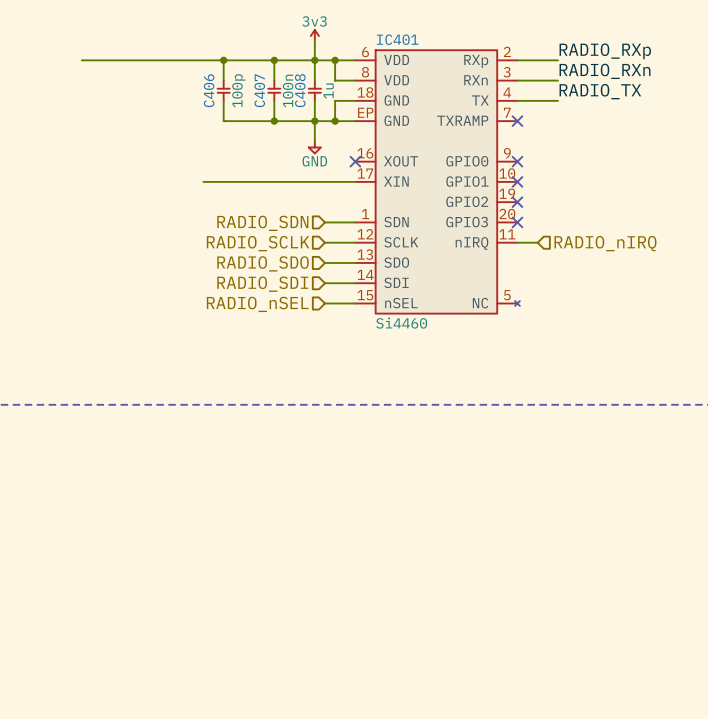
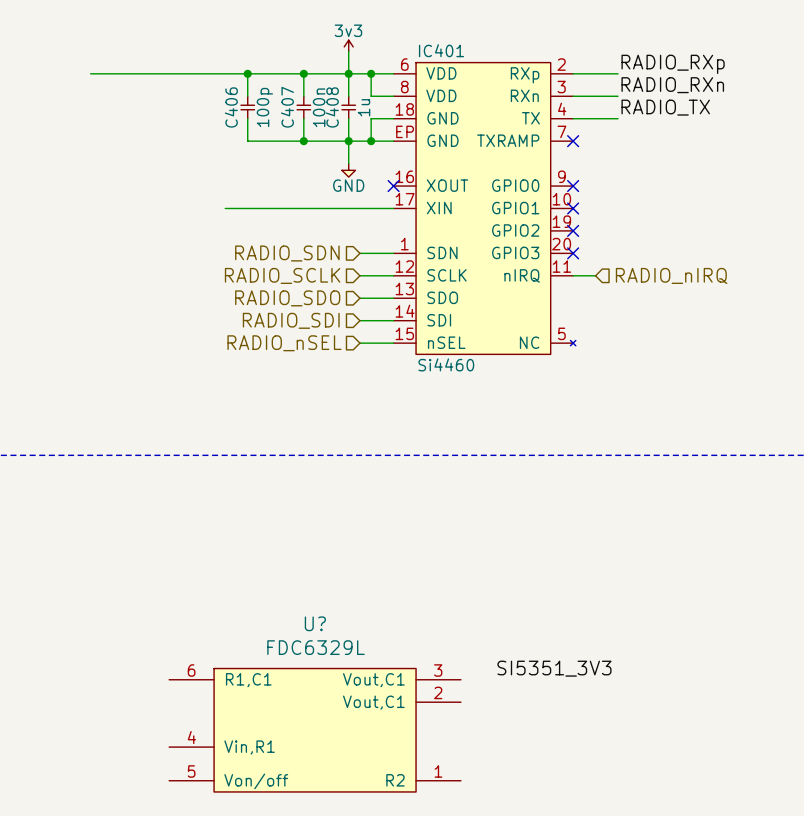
label: none -> SI5351_3V3 (554, 668)
U?: none -> FDC6329L (315, 730)

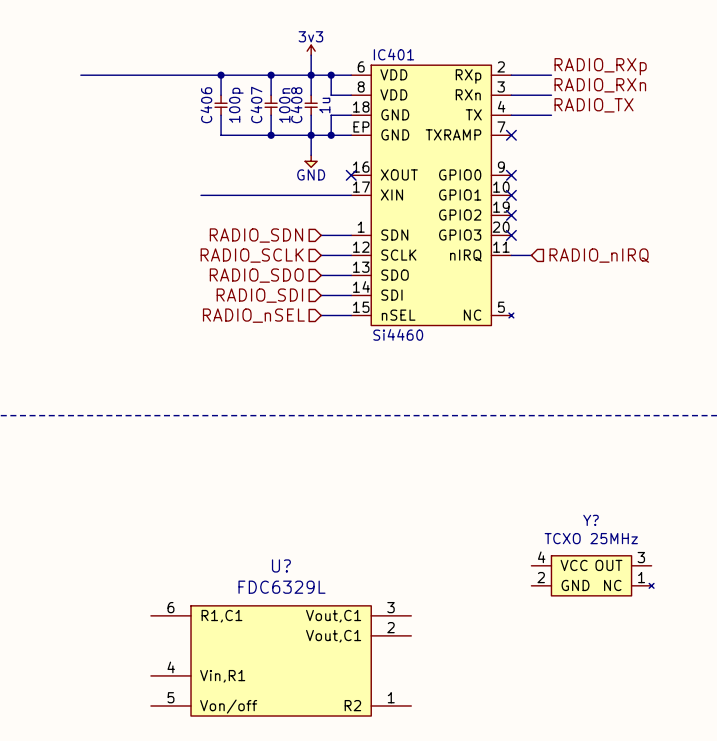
Y?: none -> TCXO 25MHz (592, 575)
label: SI5351_3V3 (554, 668) -> none

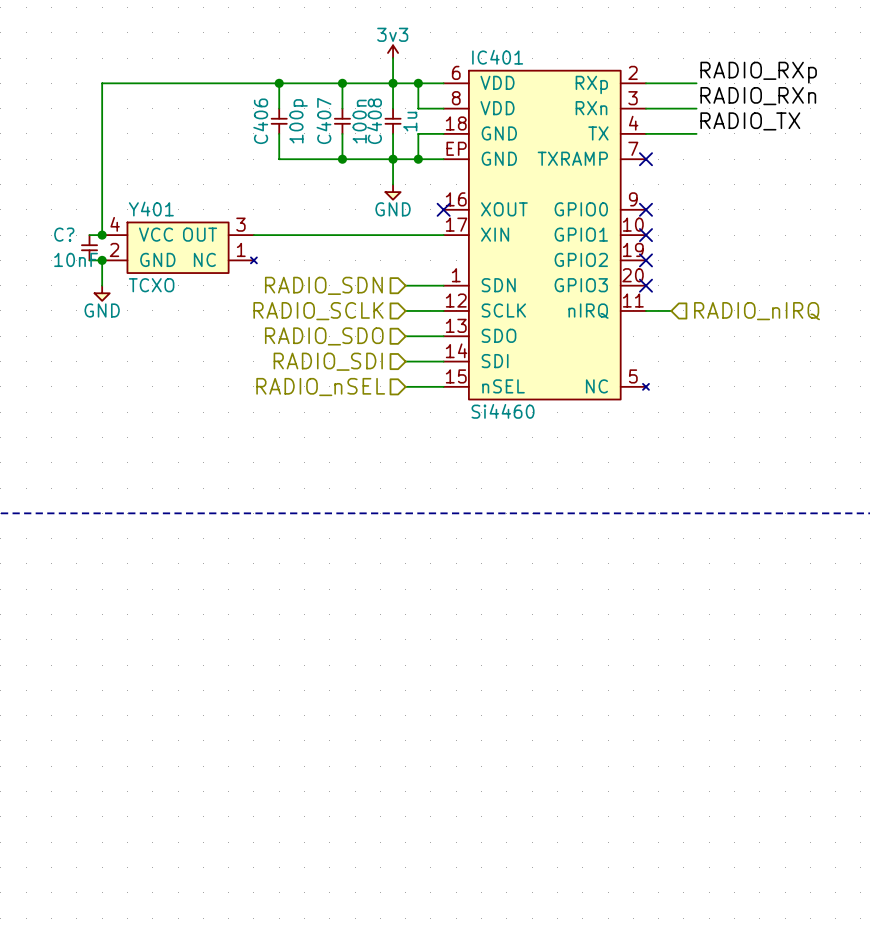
wire: none -> (102, 83) (102, 235) (89, 235)
junction: none -> (102, 235)
C?: none -> 10nF (89, 247)
Y401: none -> TCXO (179, 247)
wire: none -> (89, 260) (102, 260) (102, 285)
junction: none -> (102, 260)
power symbol: none -> GND (102, 293)
Y?: TCXO 25MHz (592, 575) -> none
U?: FDC6329L (281, 660) -> none

